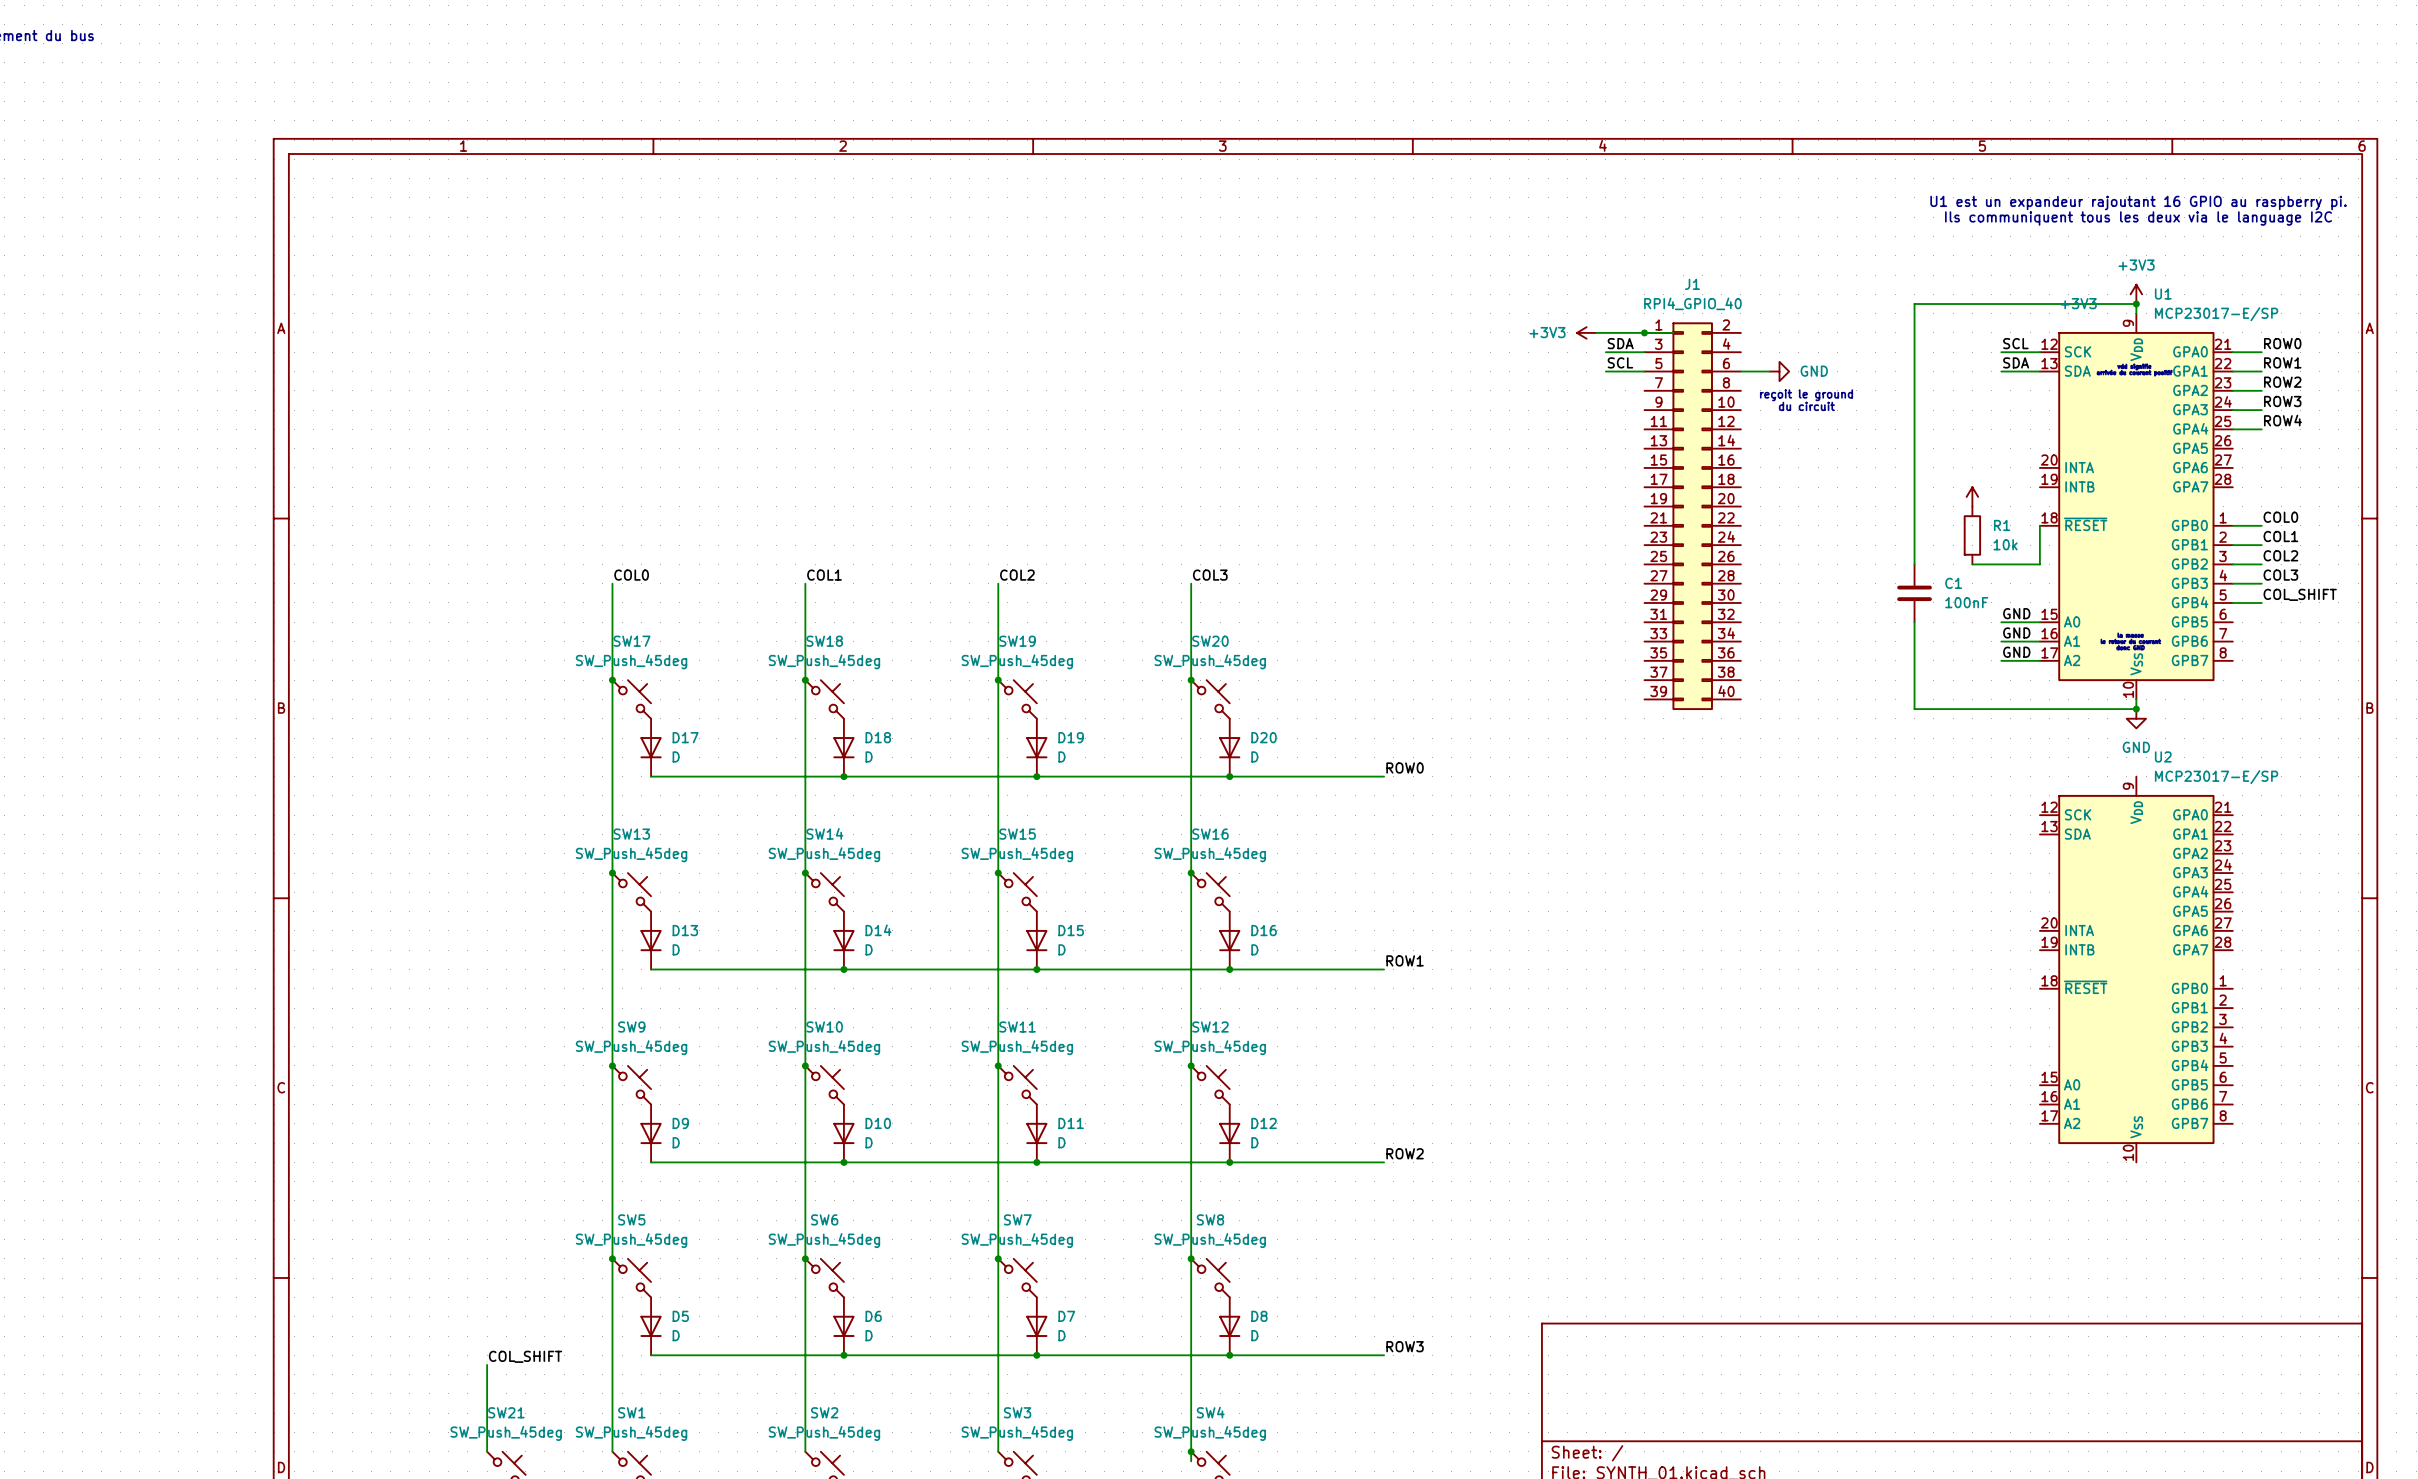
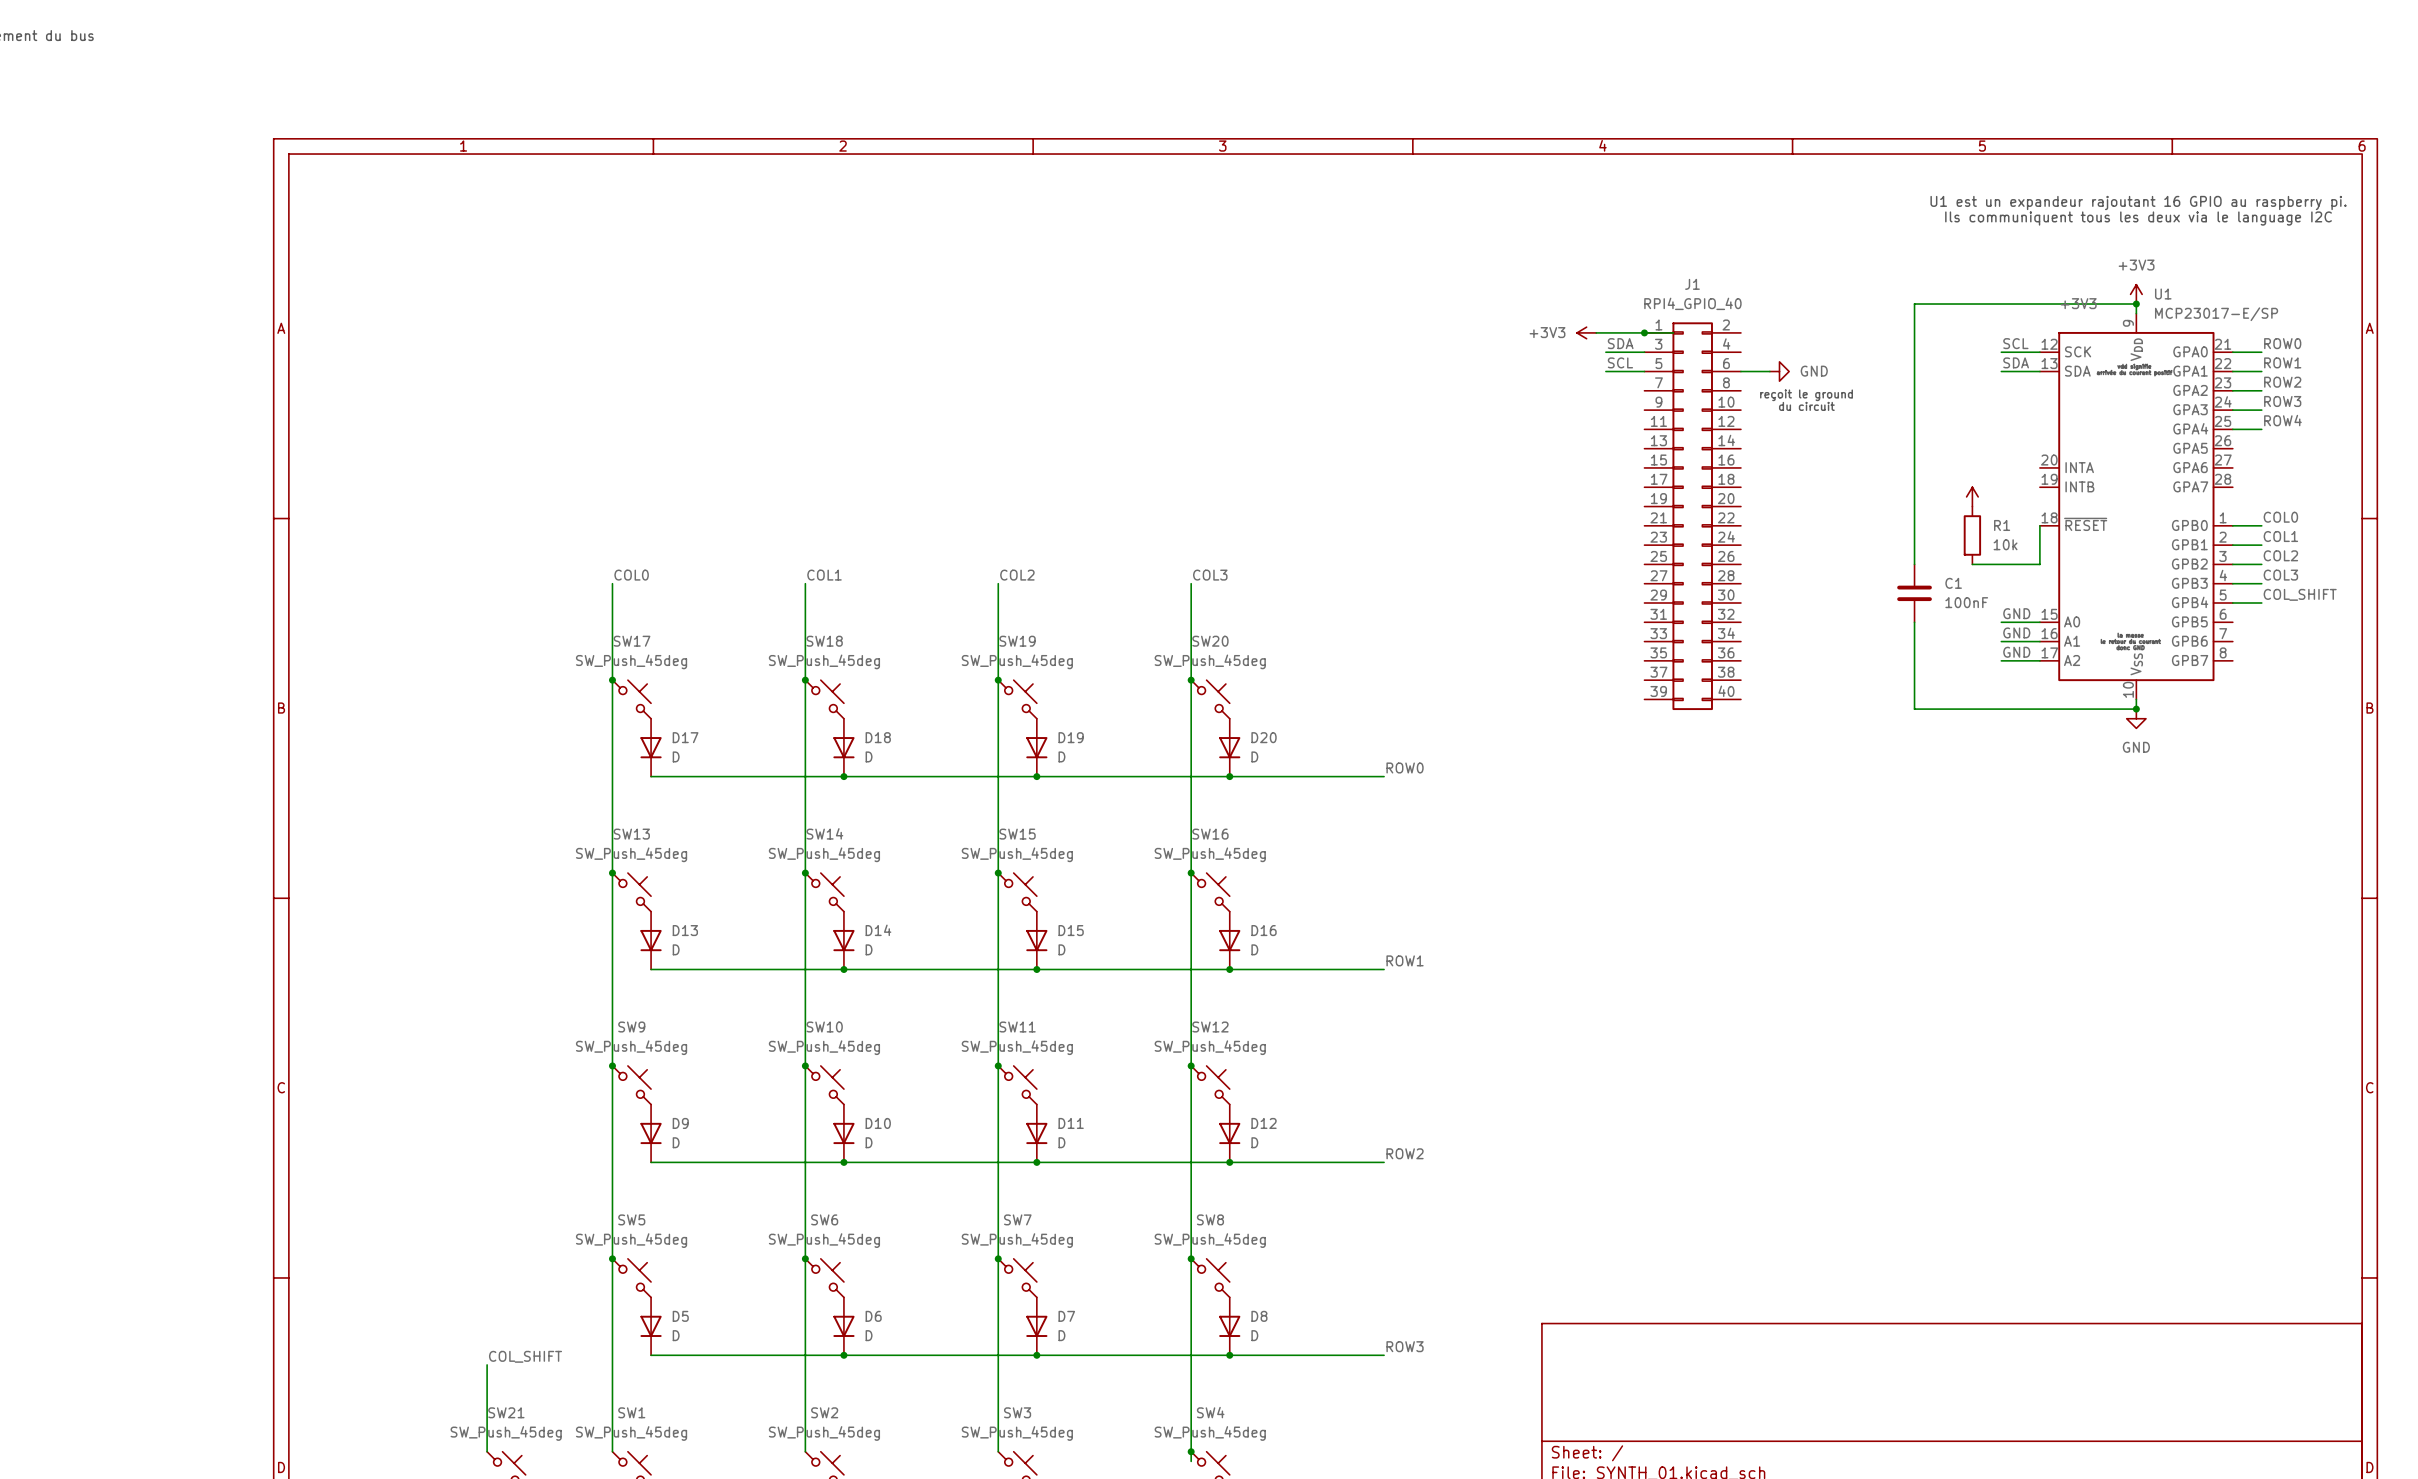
U2: MCP23017-E/SP (2136, 969) -> none

